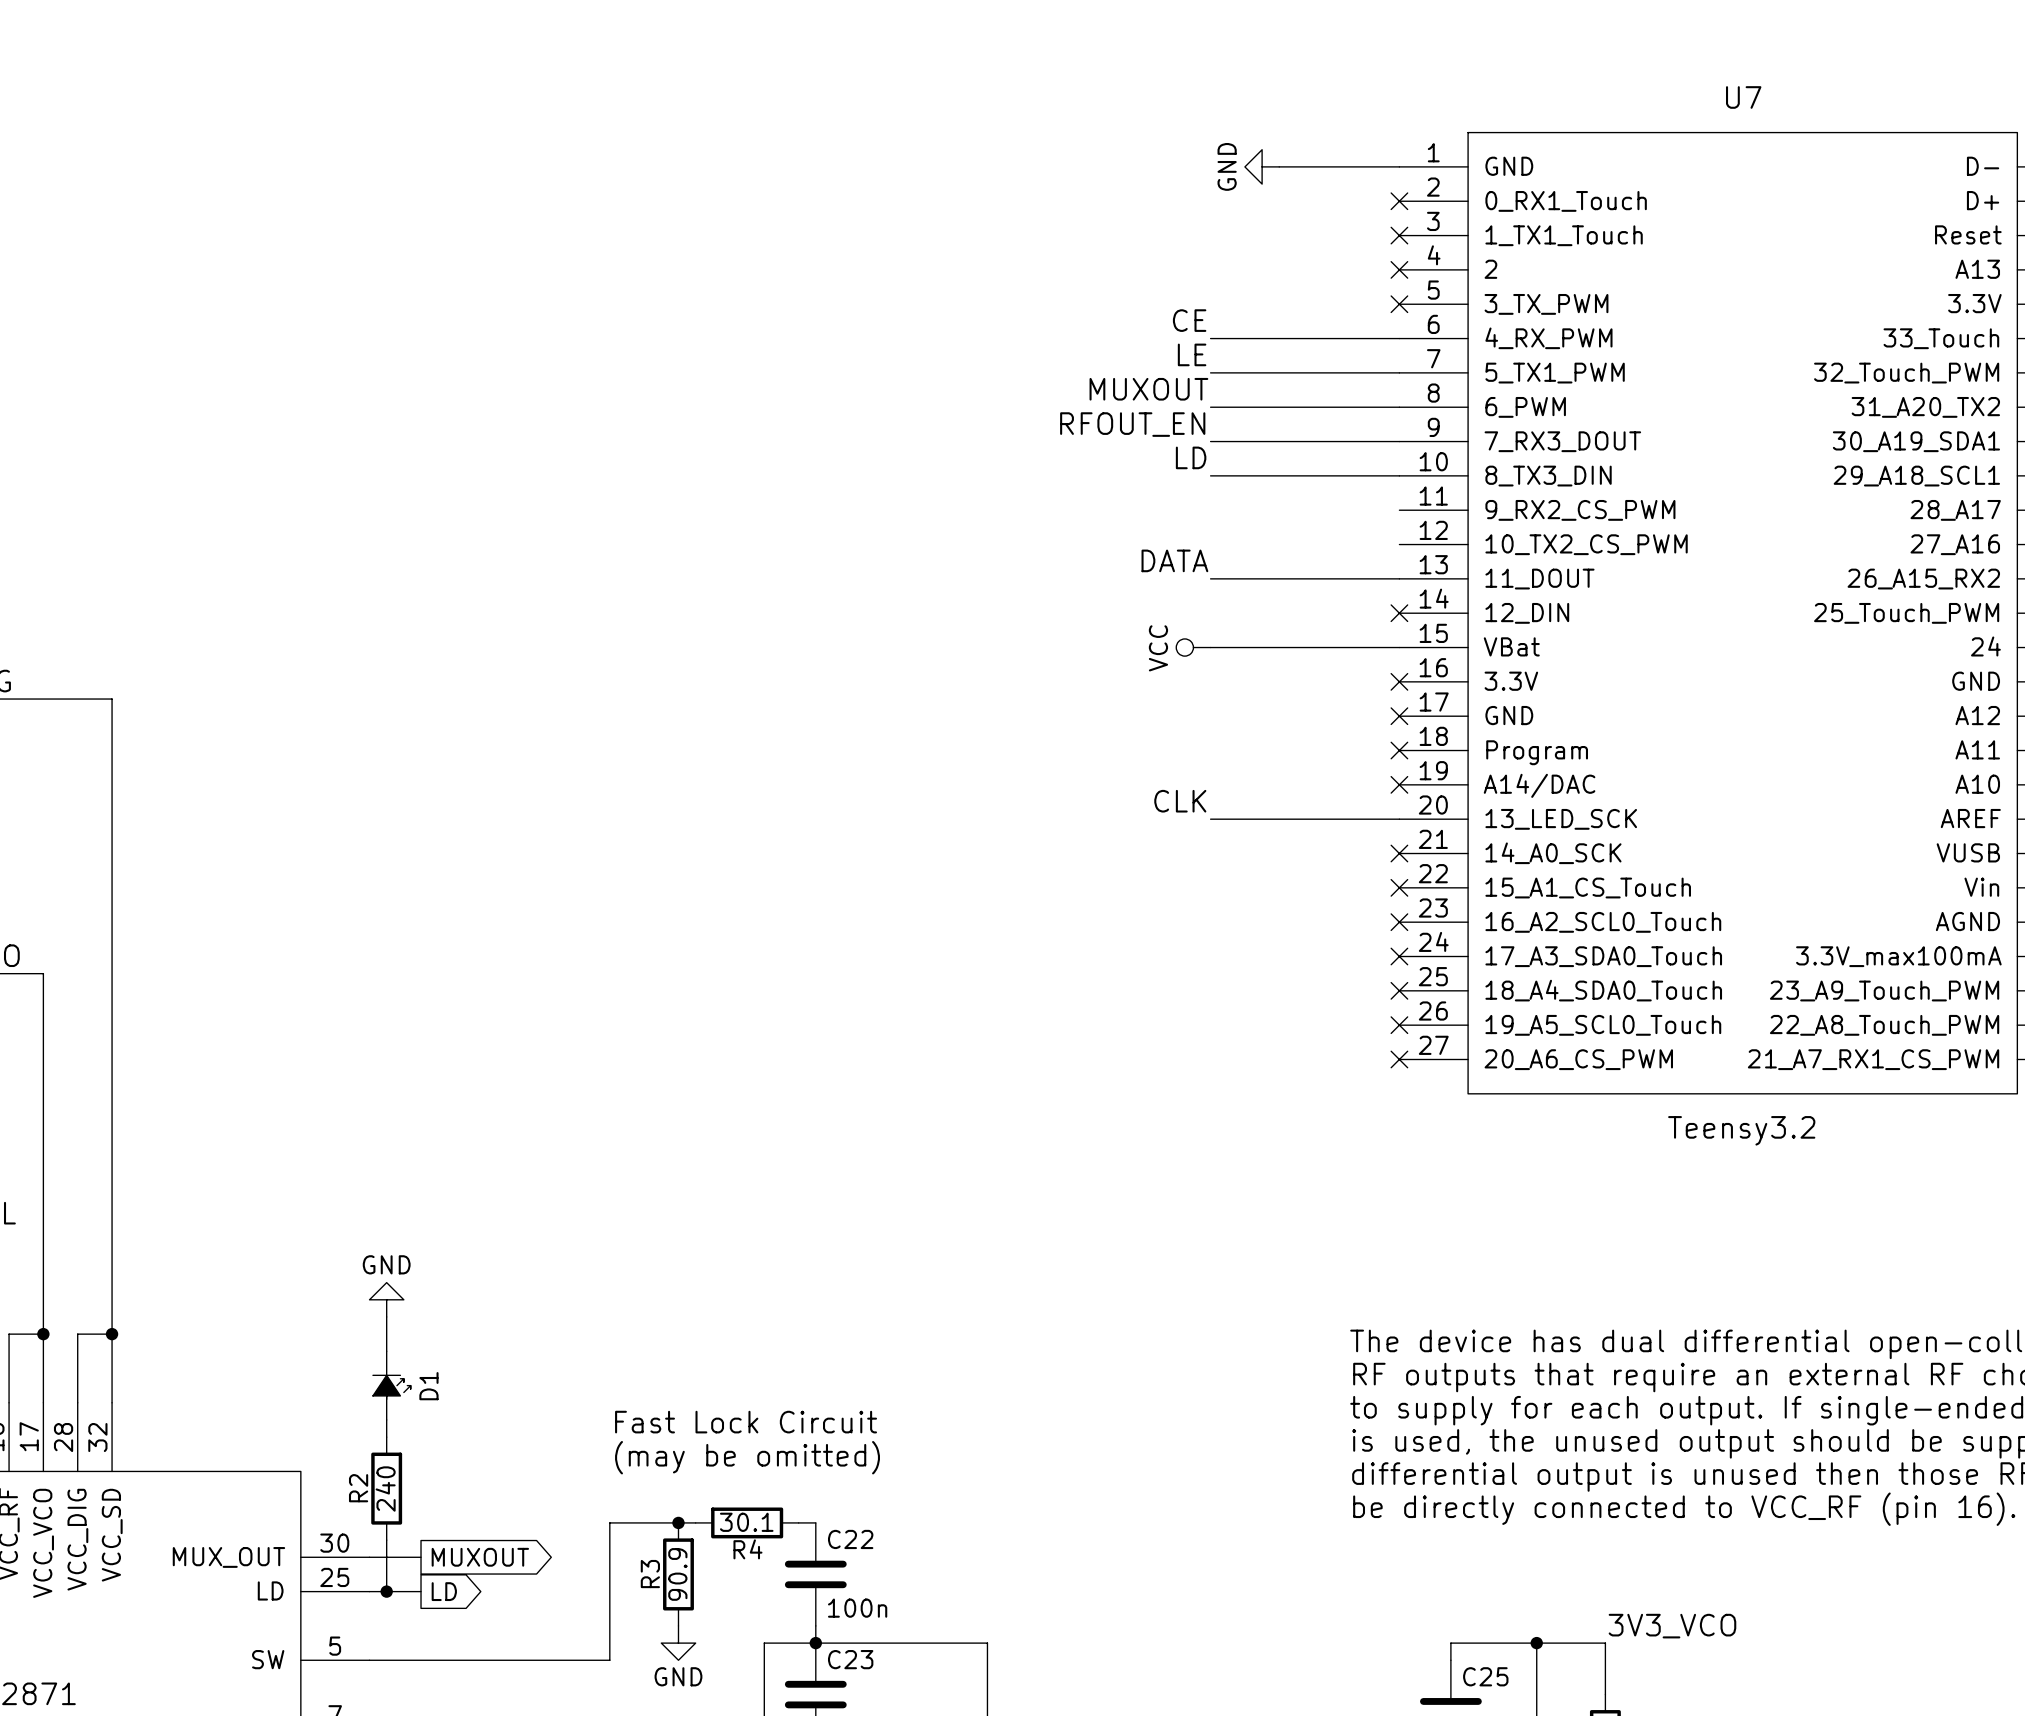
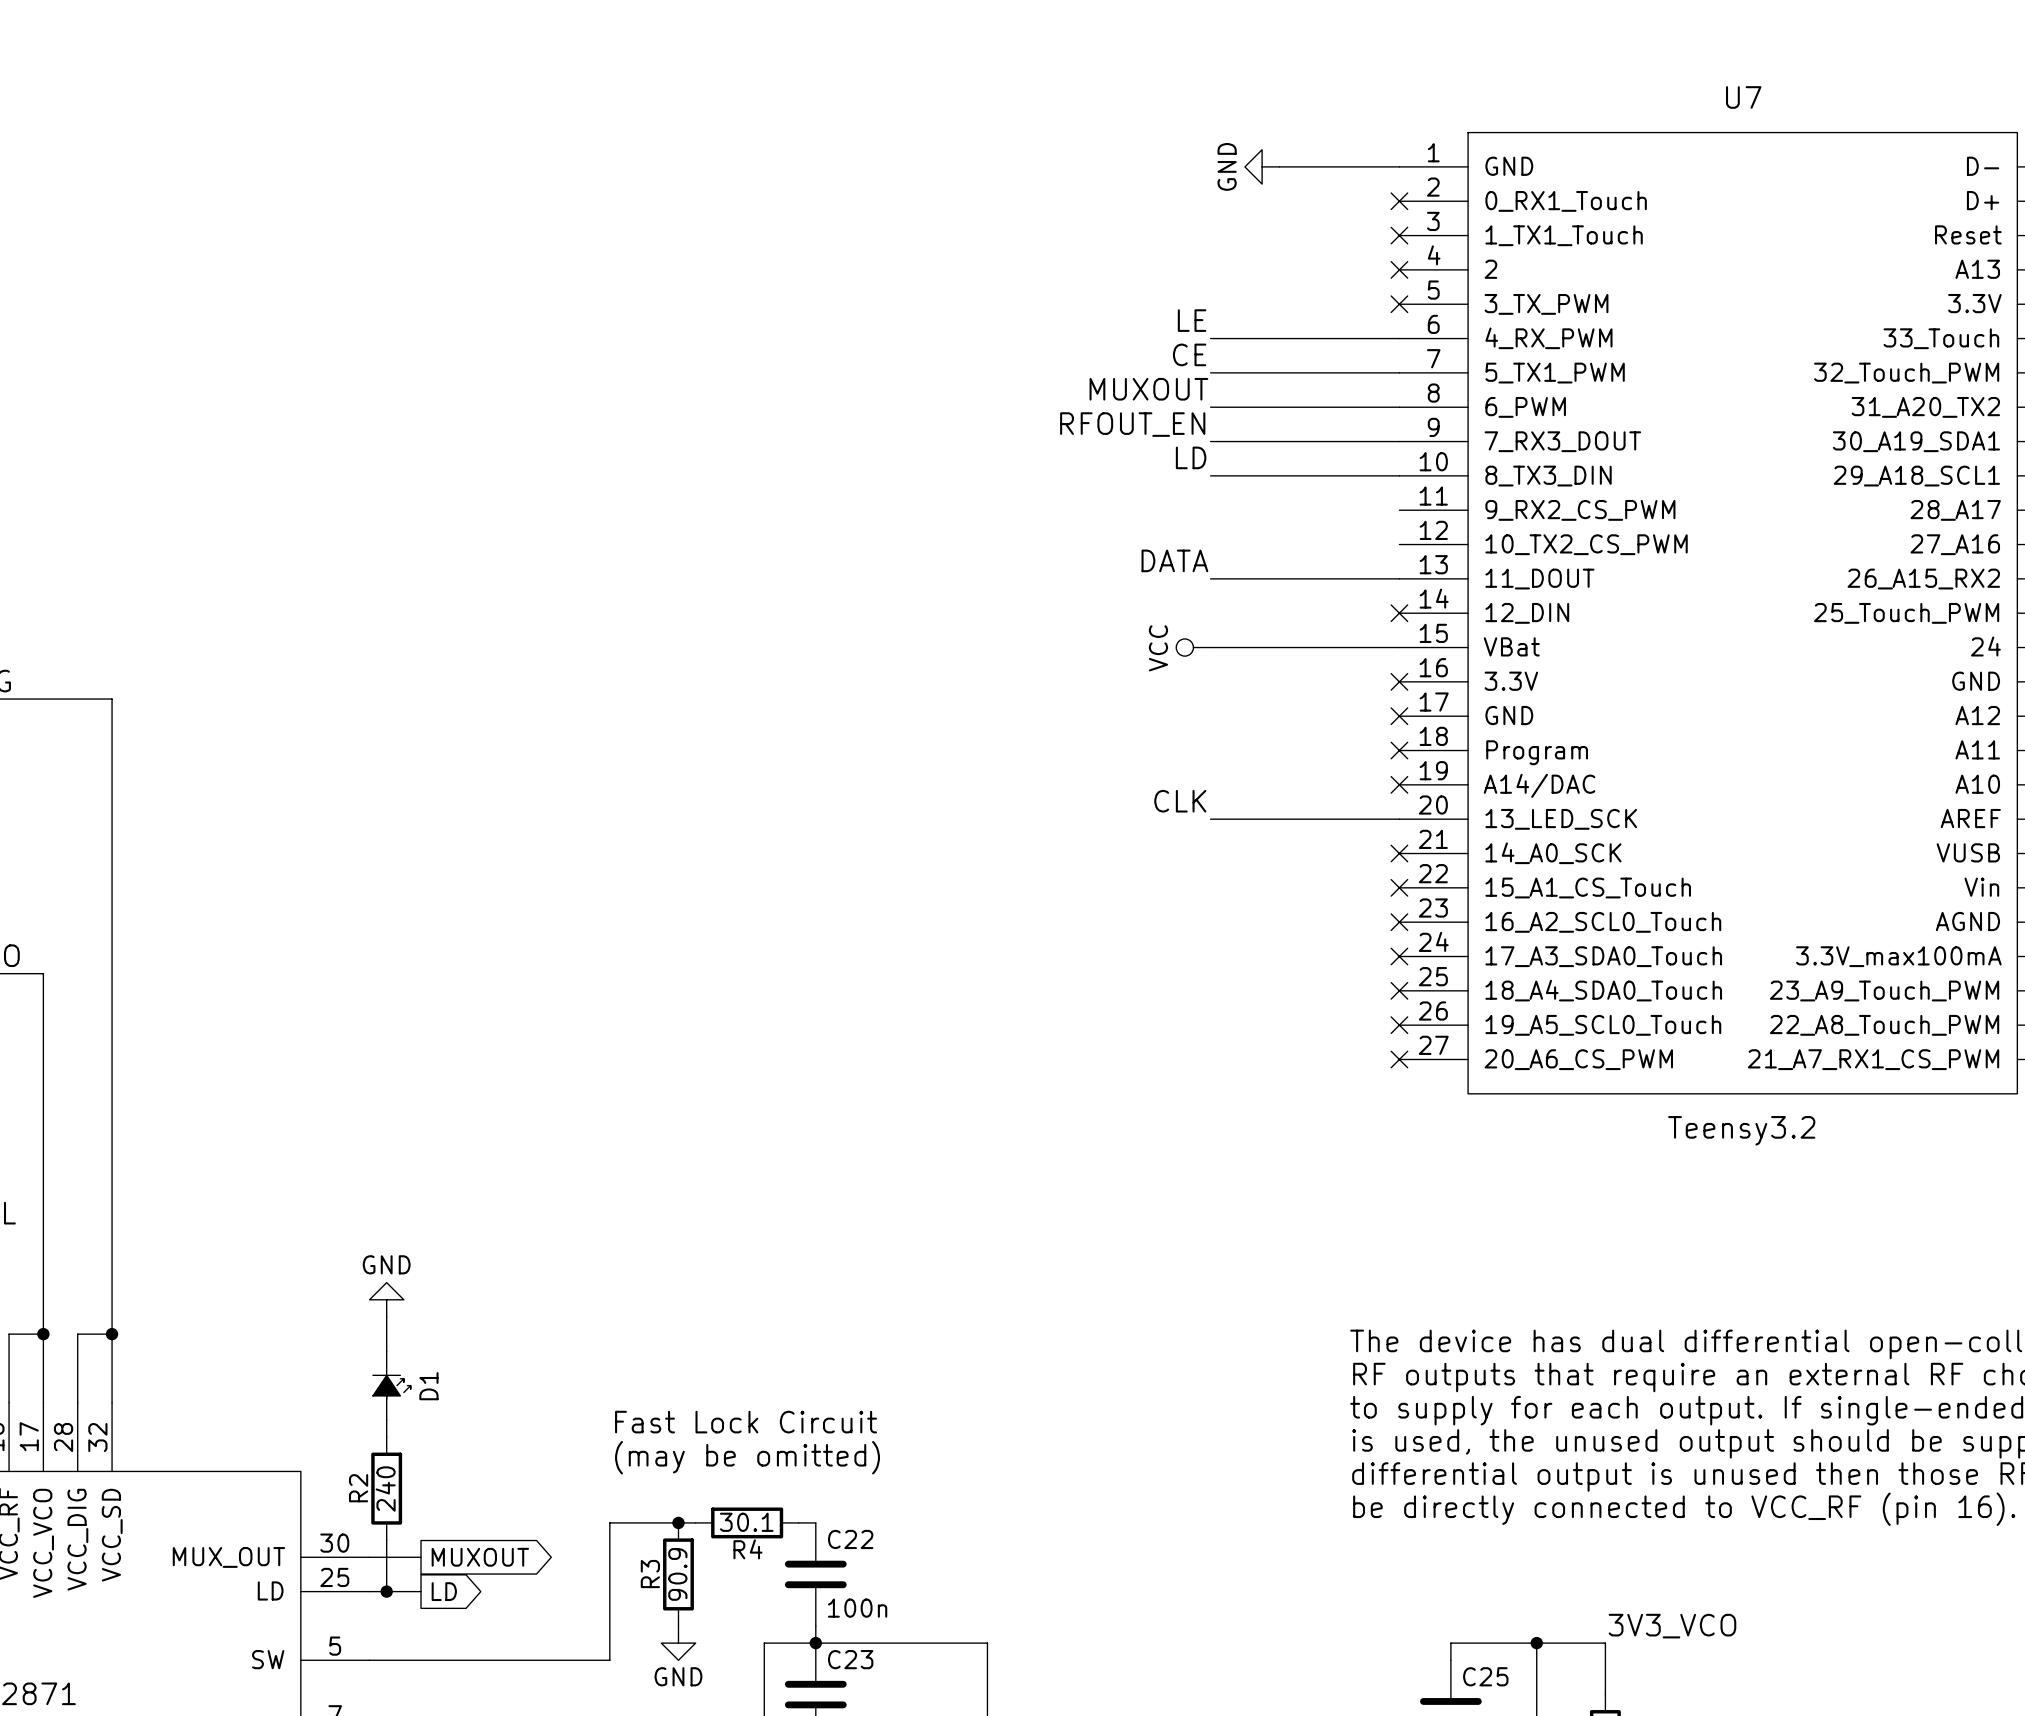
label: CE (1189, 320) -> LE (1192, 320)
label: LE (1192, 354) -> CE (1189, 354)

